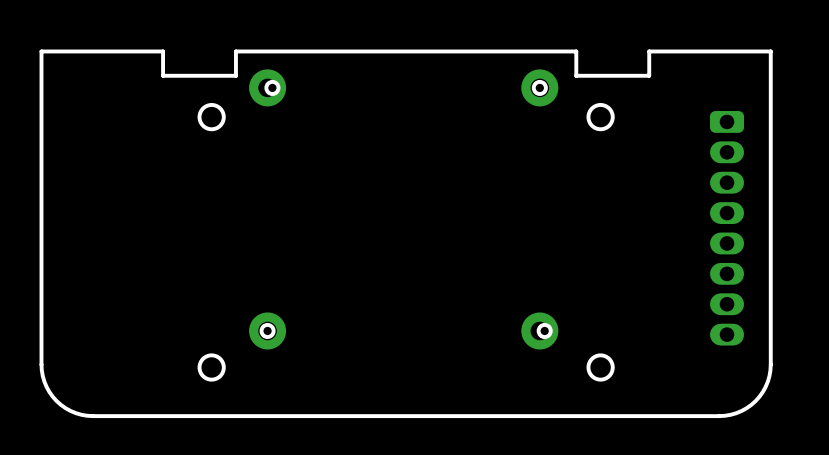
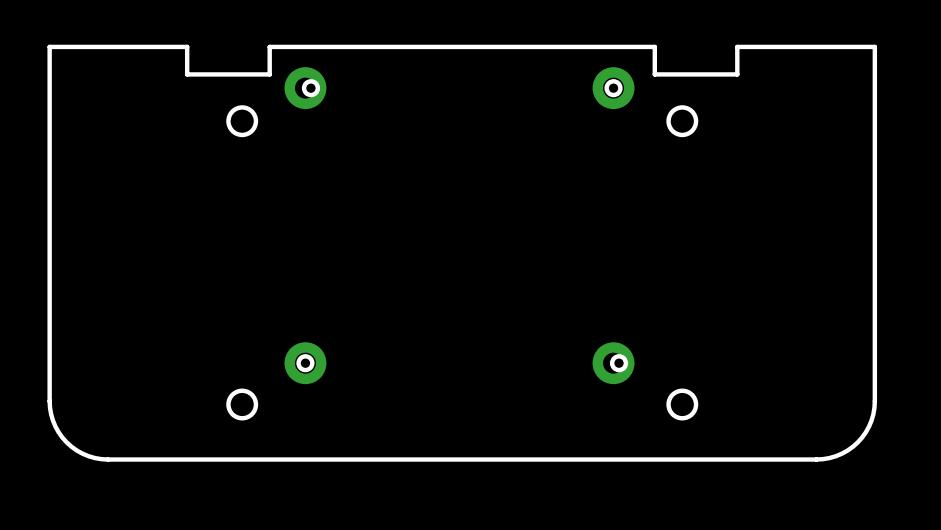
part: (727, 228) -> none

